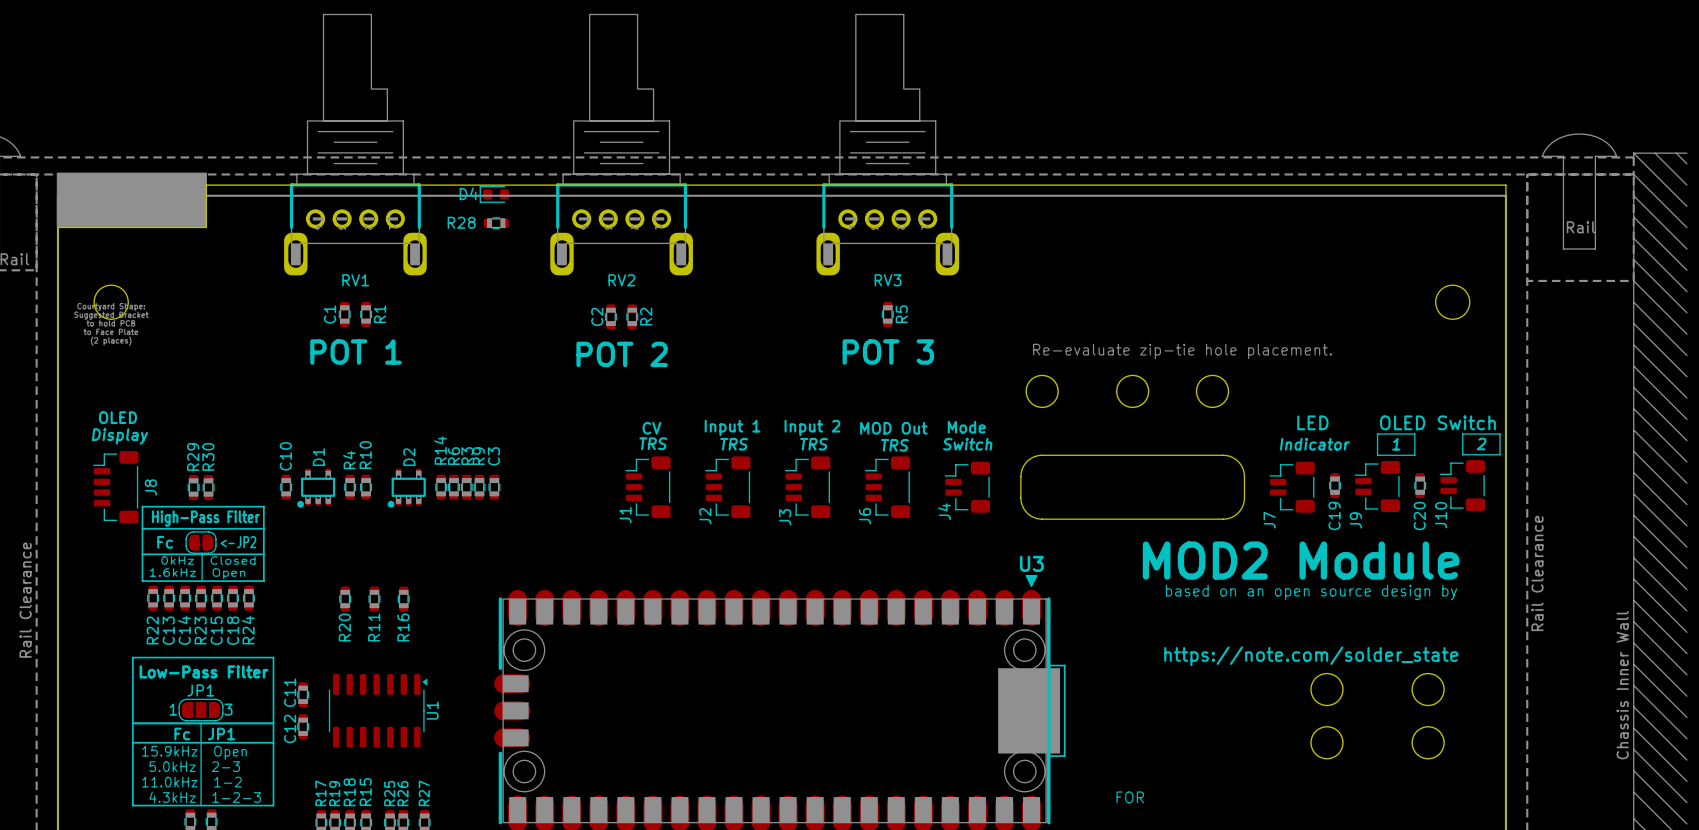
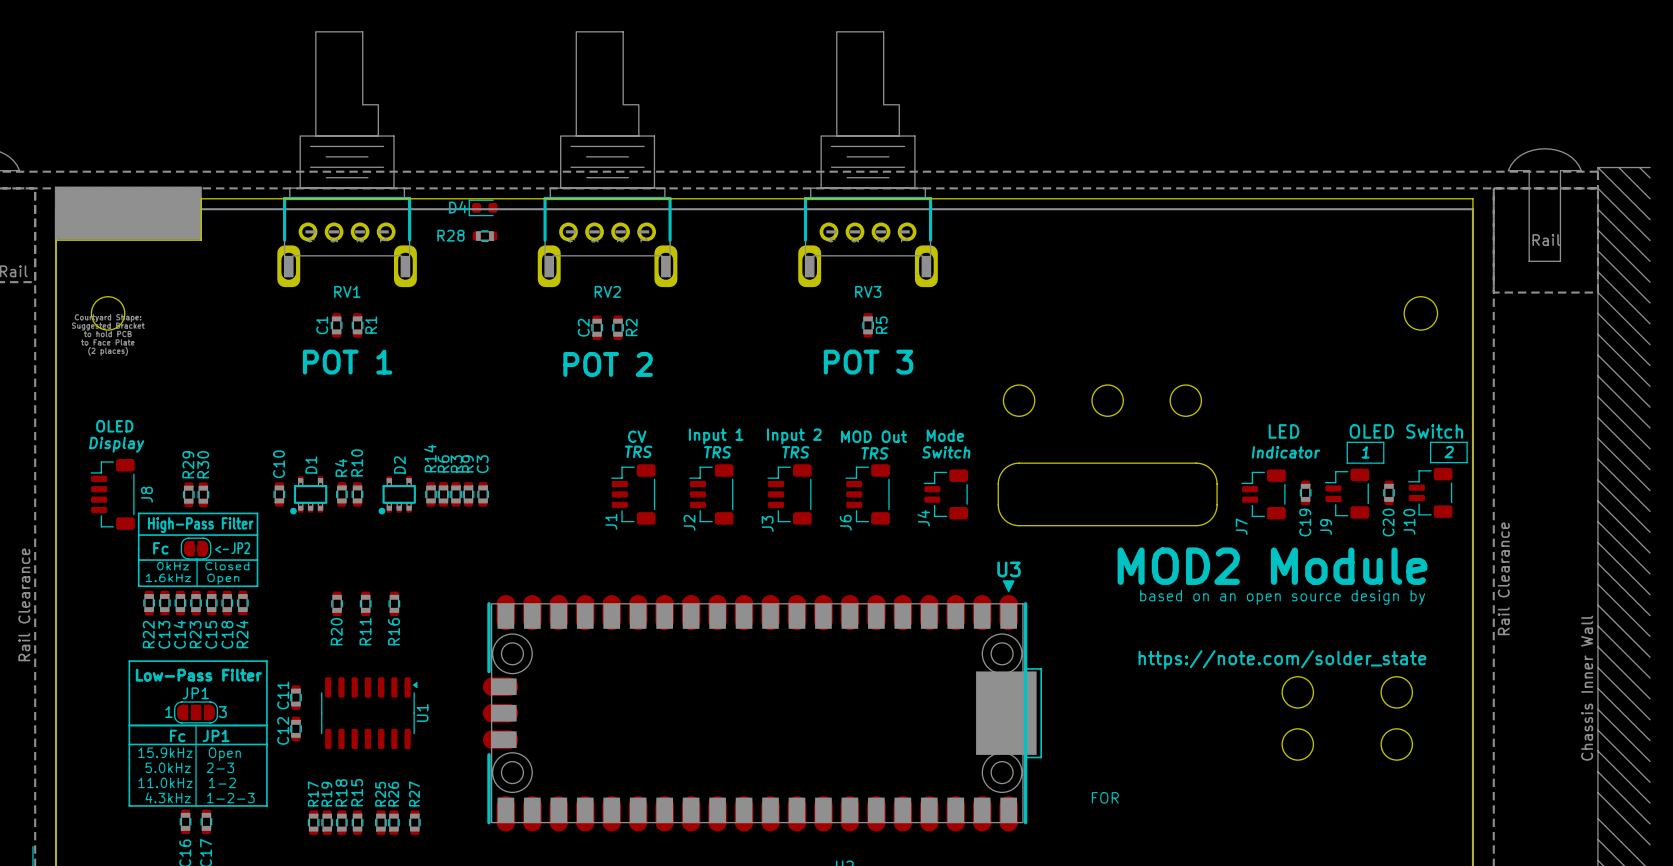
text: Re-evaluate zip-tie hole placement. (1182, 351) -> none

